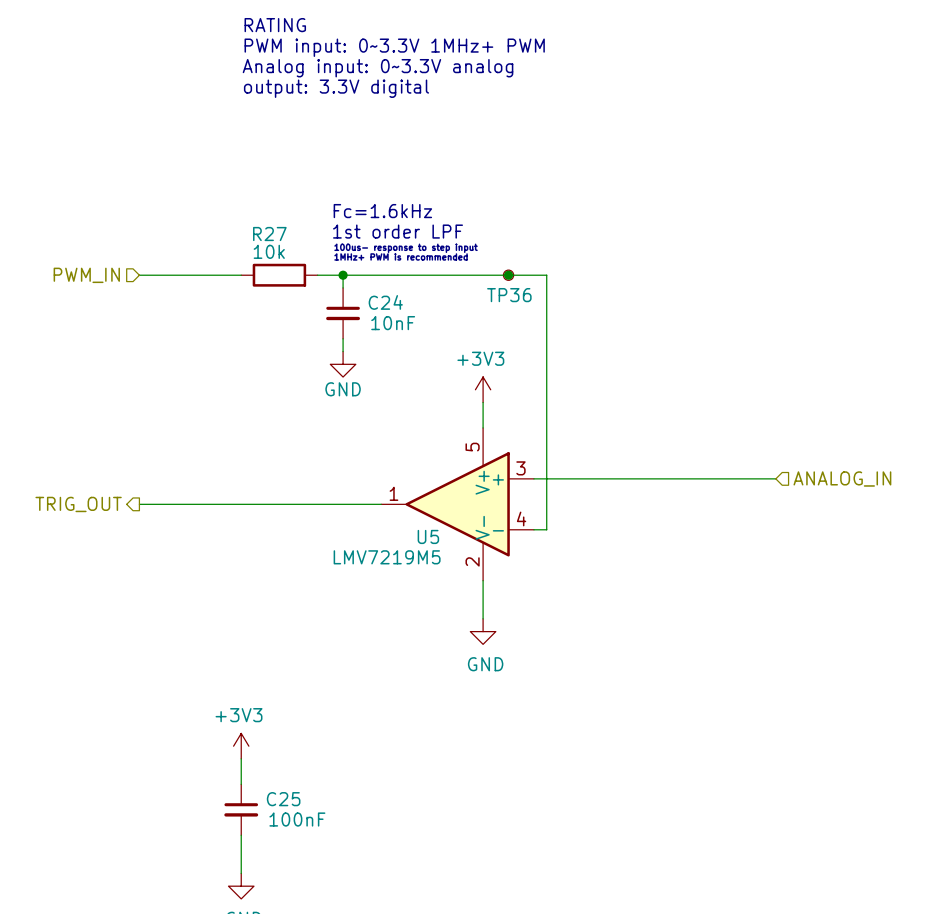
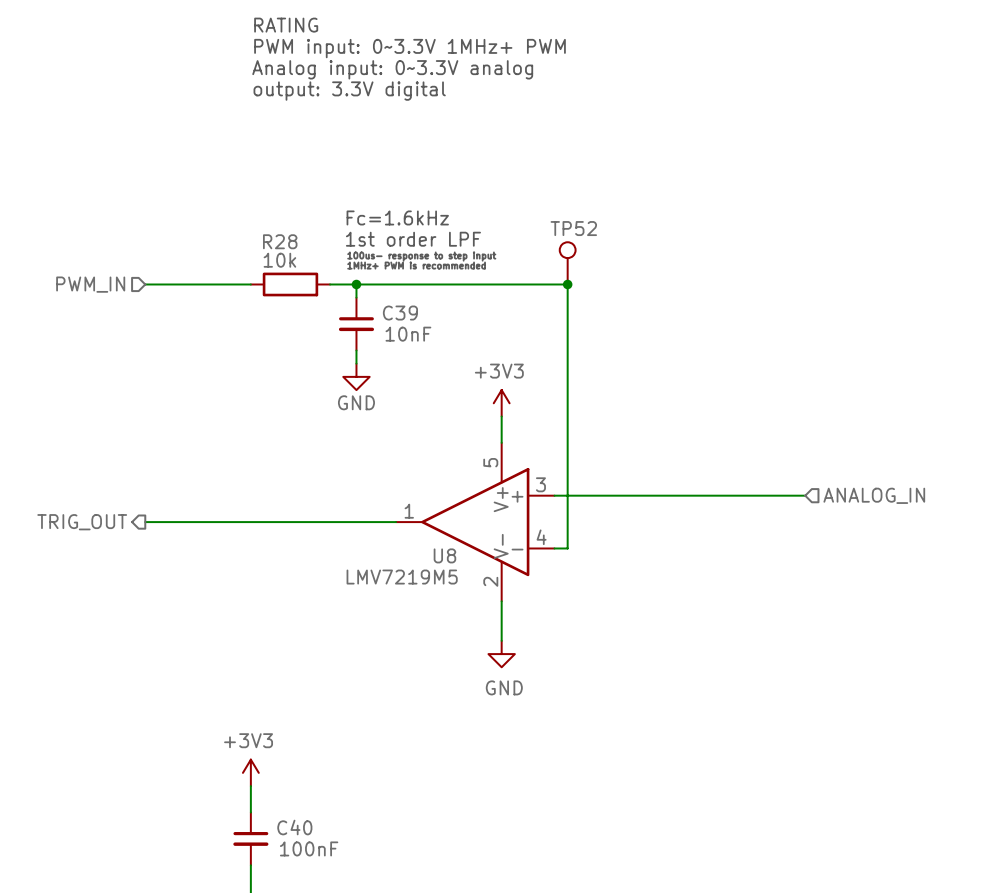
R27 name: R27 (269, 234) -> R28 (280, 241)
TP52: none -> (567, 263)
junction position: (508, 275) -> (567, 284)
TP36: (508, 275) -> none
C24 name: C24 (385, 302) -> C39 (400, 313)
U5 name: U5 (428, 536) -> U8 (444, 555)
C25 name: C25 (283, 799) -> C40 (294, 827)

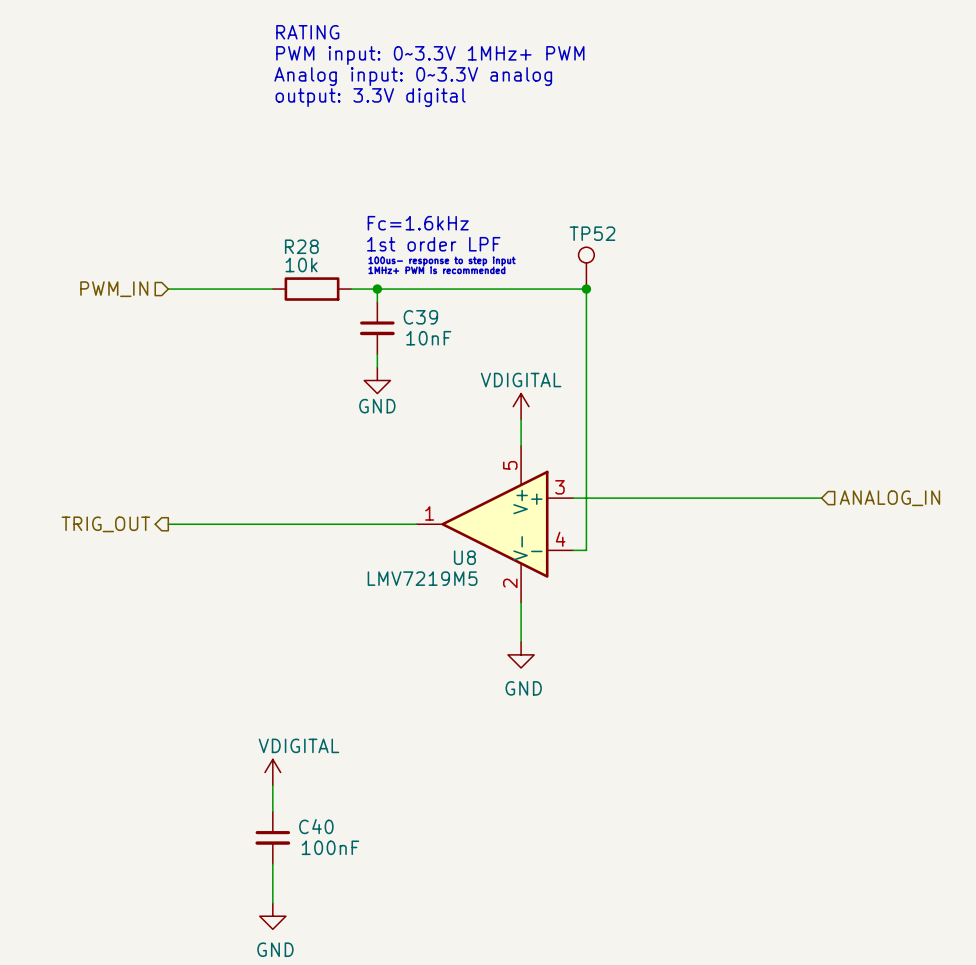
power symbol: +3V3 (501, 403) -> VDIGITAL (521, 406)
power symbol: +3V3 (250, 772) -> VDIGITAL (272, 772)

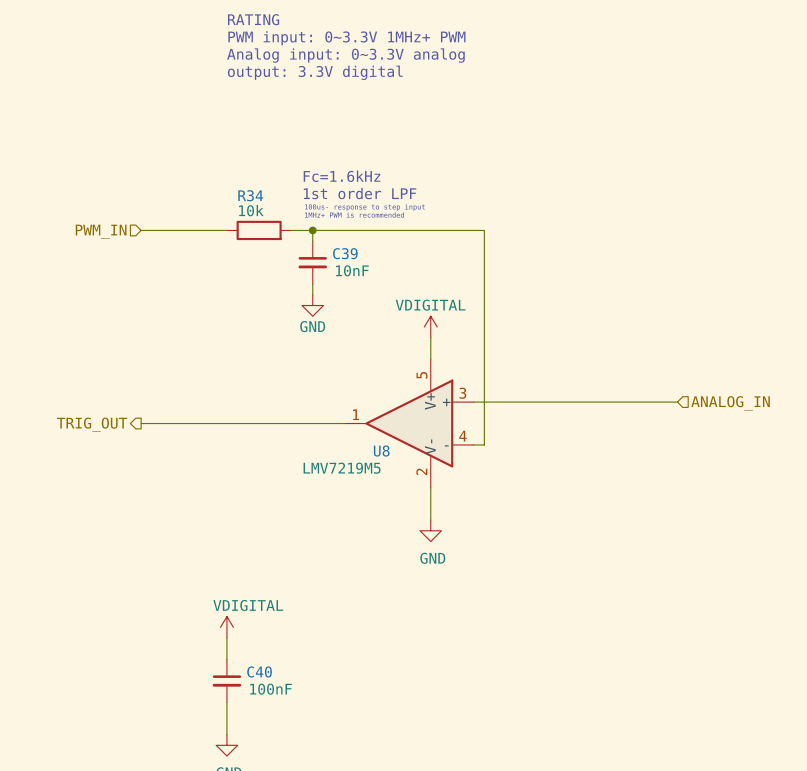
R28 name: R28 (301, 246) -> R34 (250, 195)
TP52: (586, 268) -> none
junction: (586, 289) -> none

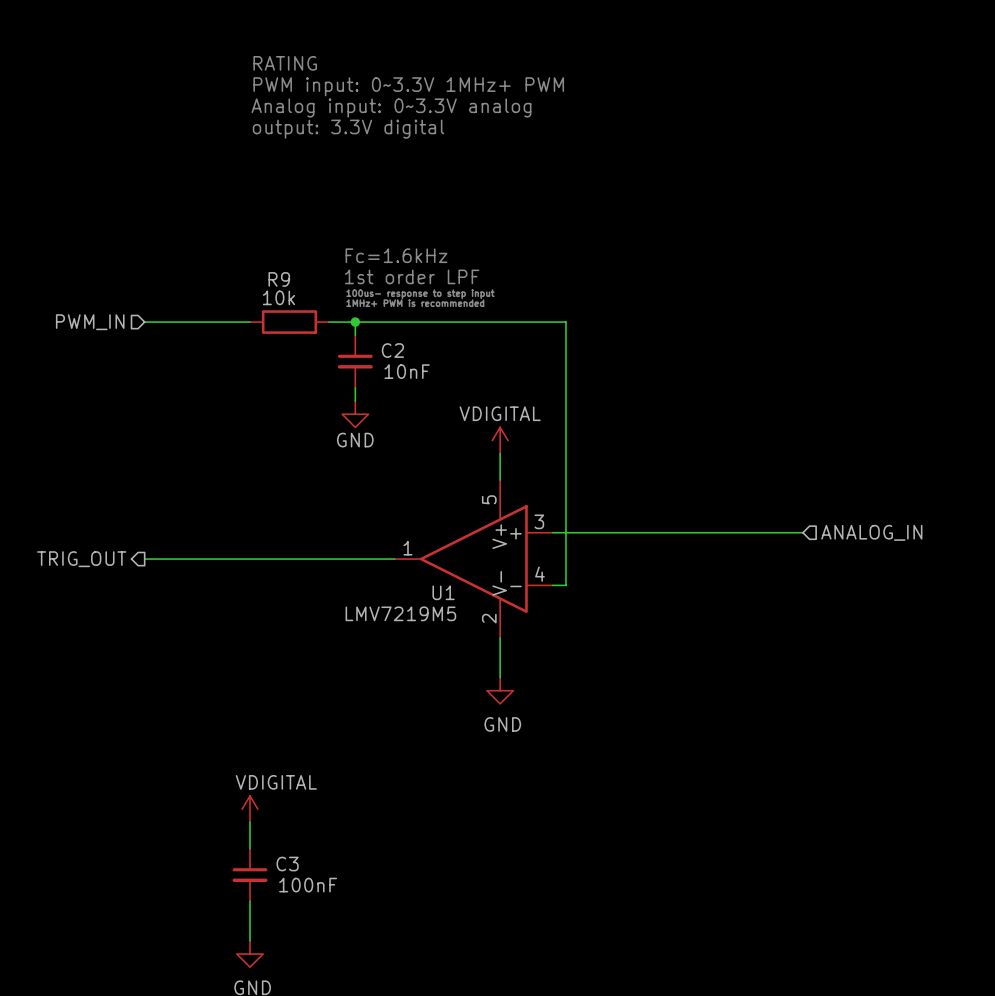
R34 name: R34 (250, 195) -> R9 (279, 279)
C39 name: C39 (345, 253) -> C2 (392, 350)
U8 name: U8 (381, 451) -> U1 (443, 592)
C40 name: C40 (259, 671) -> C3 (287, 864)

